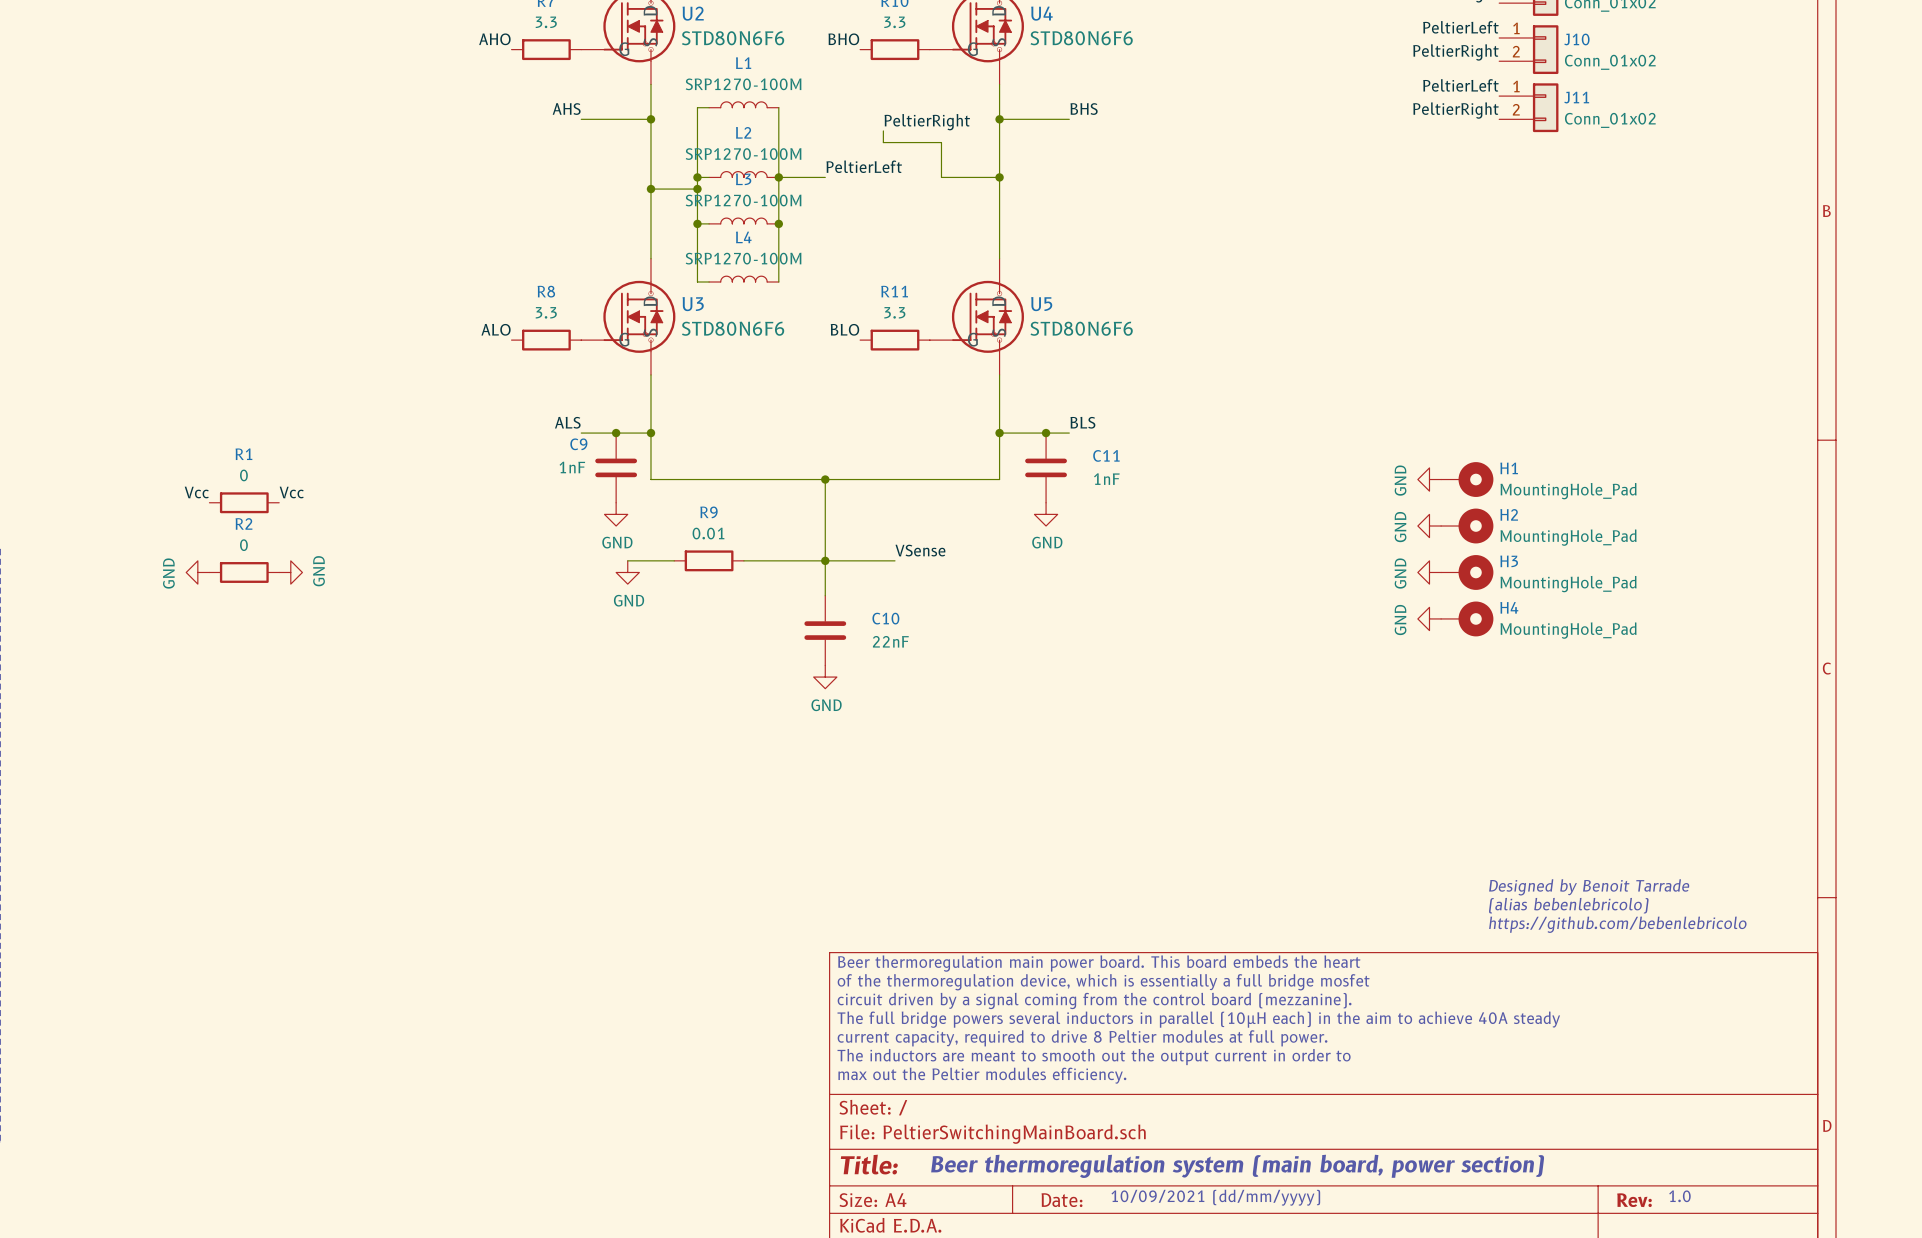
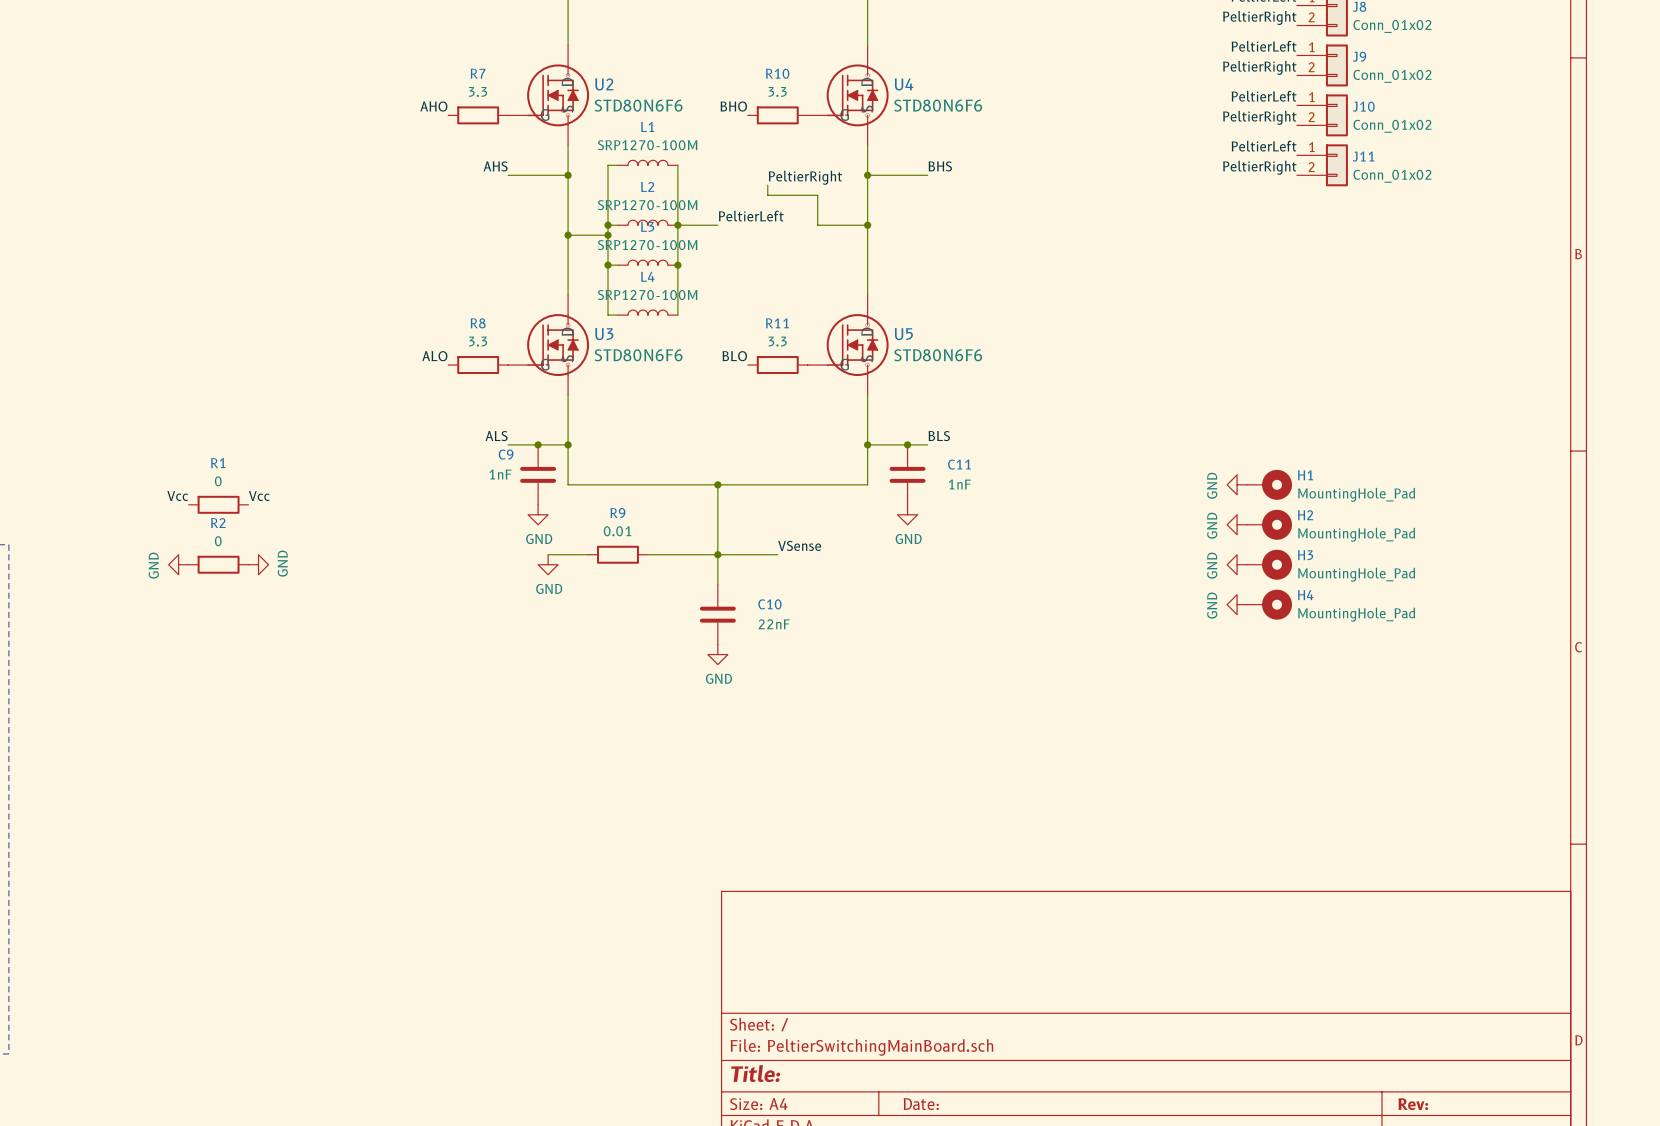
text: Designed by Benoit Tarrade (1589, 887) -> none
text: (alias bebenlebricolo) (1568, 905) -> none
text: https://github.com/bebenlebricolo (1617, 924) -> none
text: Beer thermoregulation main power board. This board embeds the heart (1099, 963) -> none
text: of the thermoregulation device, which is essentially a full bridge mosfet (1103, 982) -> none
text: circuit driven by a signal coming from the control board (mezzanine). (1094, 1000) -> none
text: The full bridge powers several inductors in parallel (10µH each) in the aim to achieve 40A steady (1198, 1019) -> none
text: current capacity, required to drive 8 Peltier modules at full power. (1082, 1038) -> none
text: The inductors are meant to smooth out the output current in order to (1094, 1057) -> none
text: max out the Peltier modules efficiency. (982, 1075) -> none
text: Beer thermoregulation system (main board, power section) (1237, 1166) -> none
text: 1.0 (1679, 1196) -> none
text: 10/09/2021 (dd/mm/yyyy) (1215, 1197) -> none

